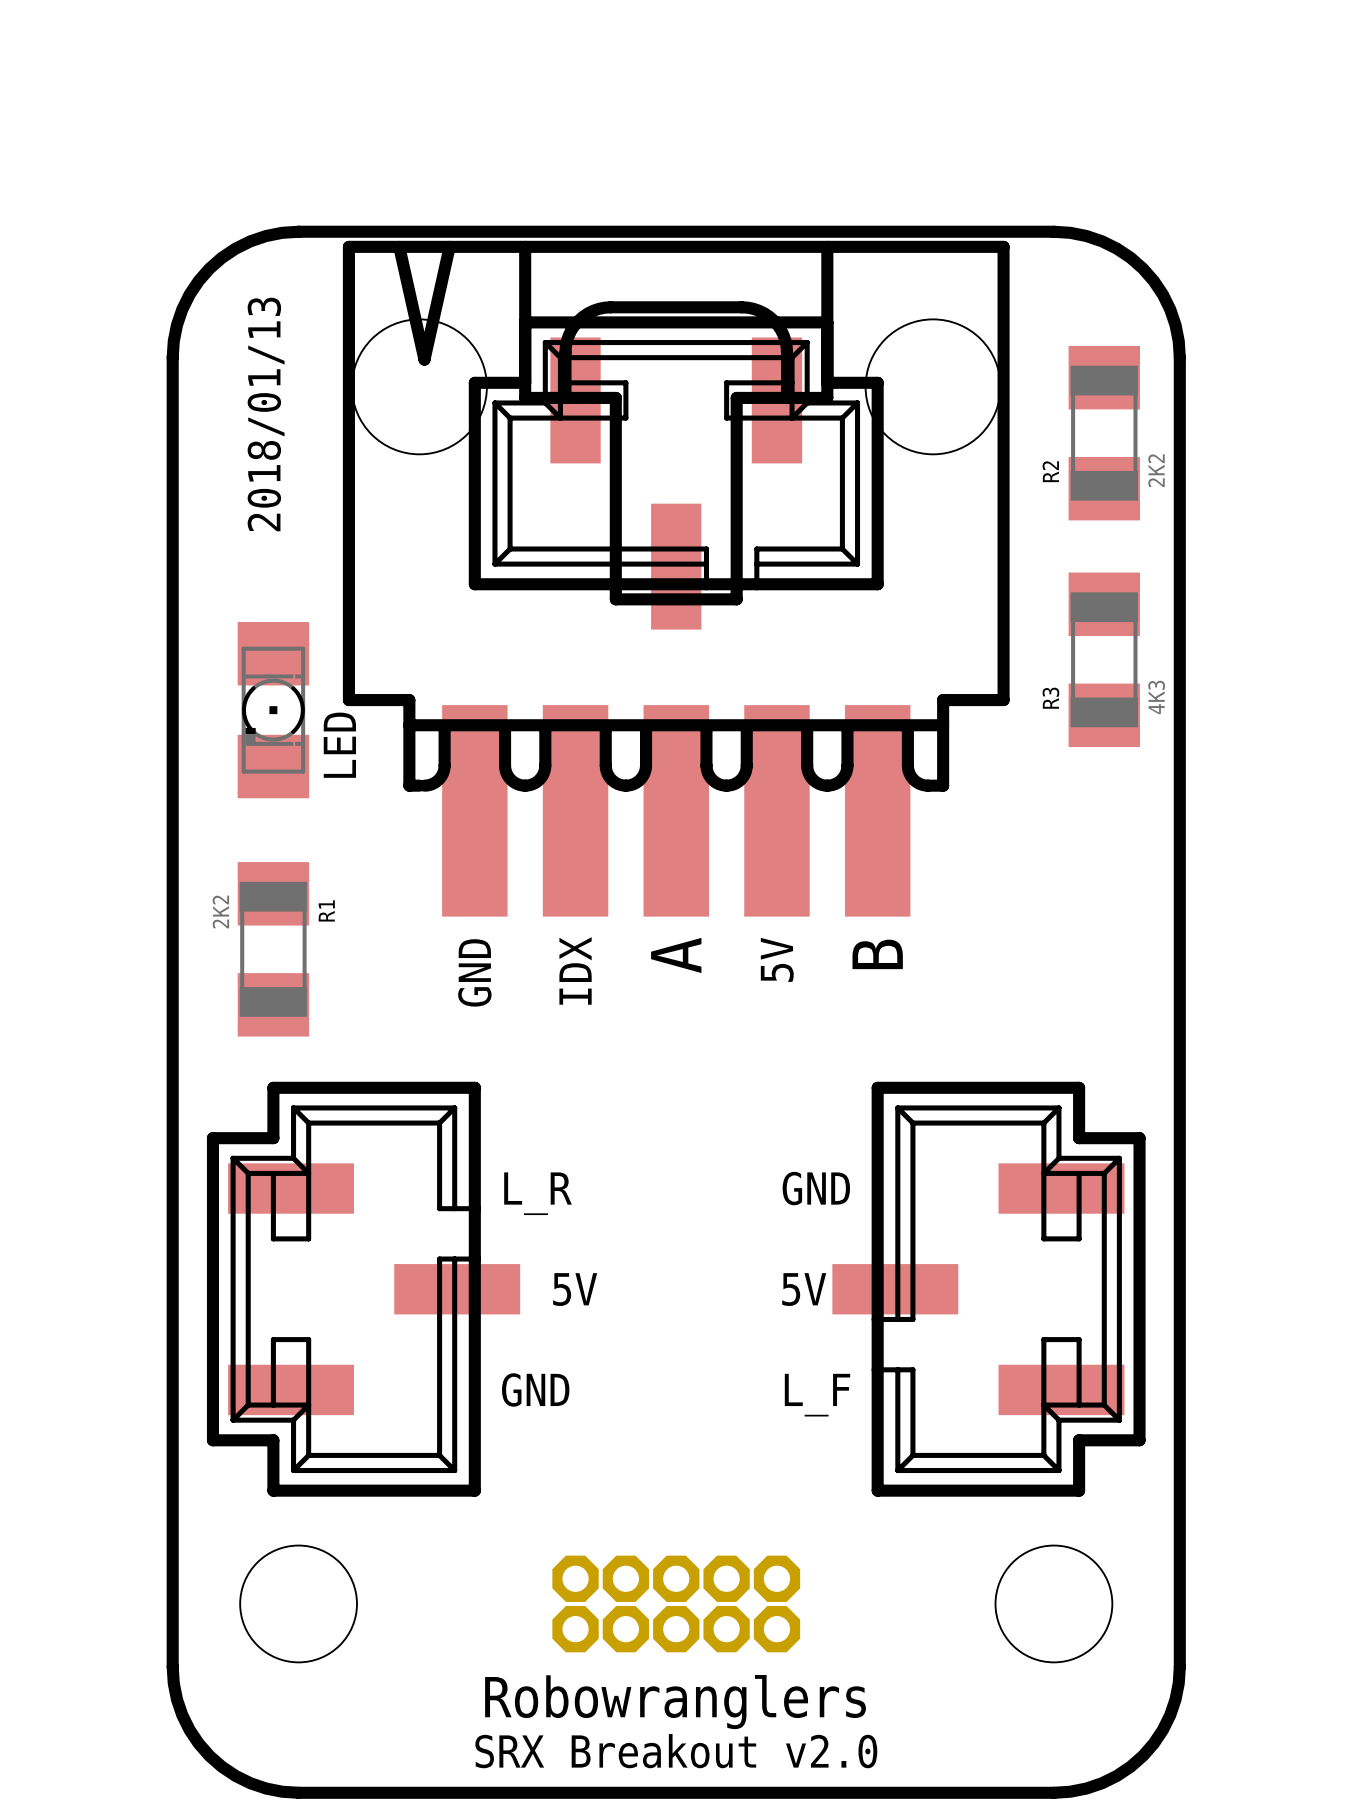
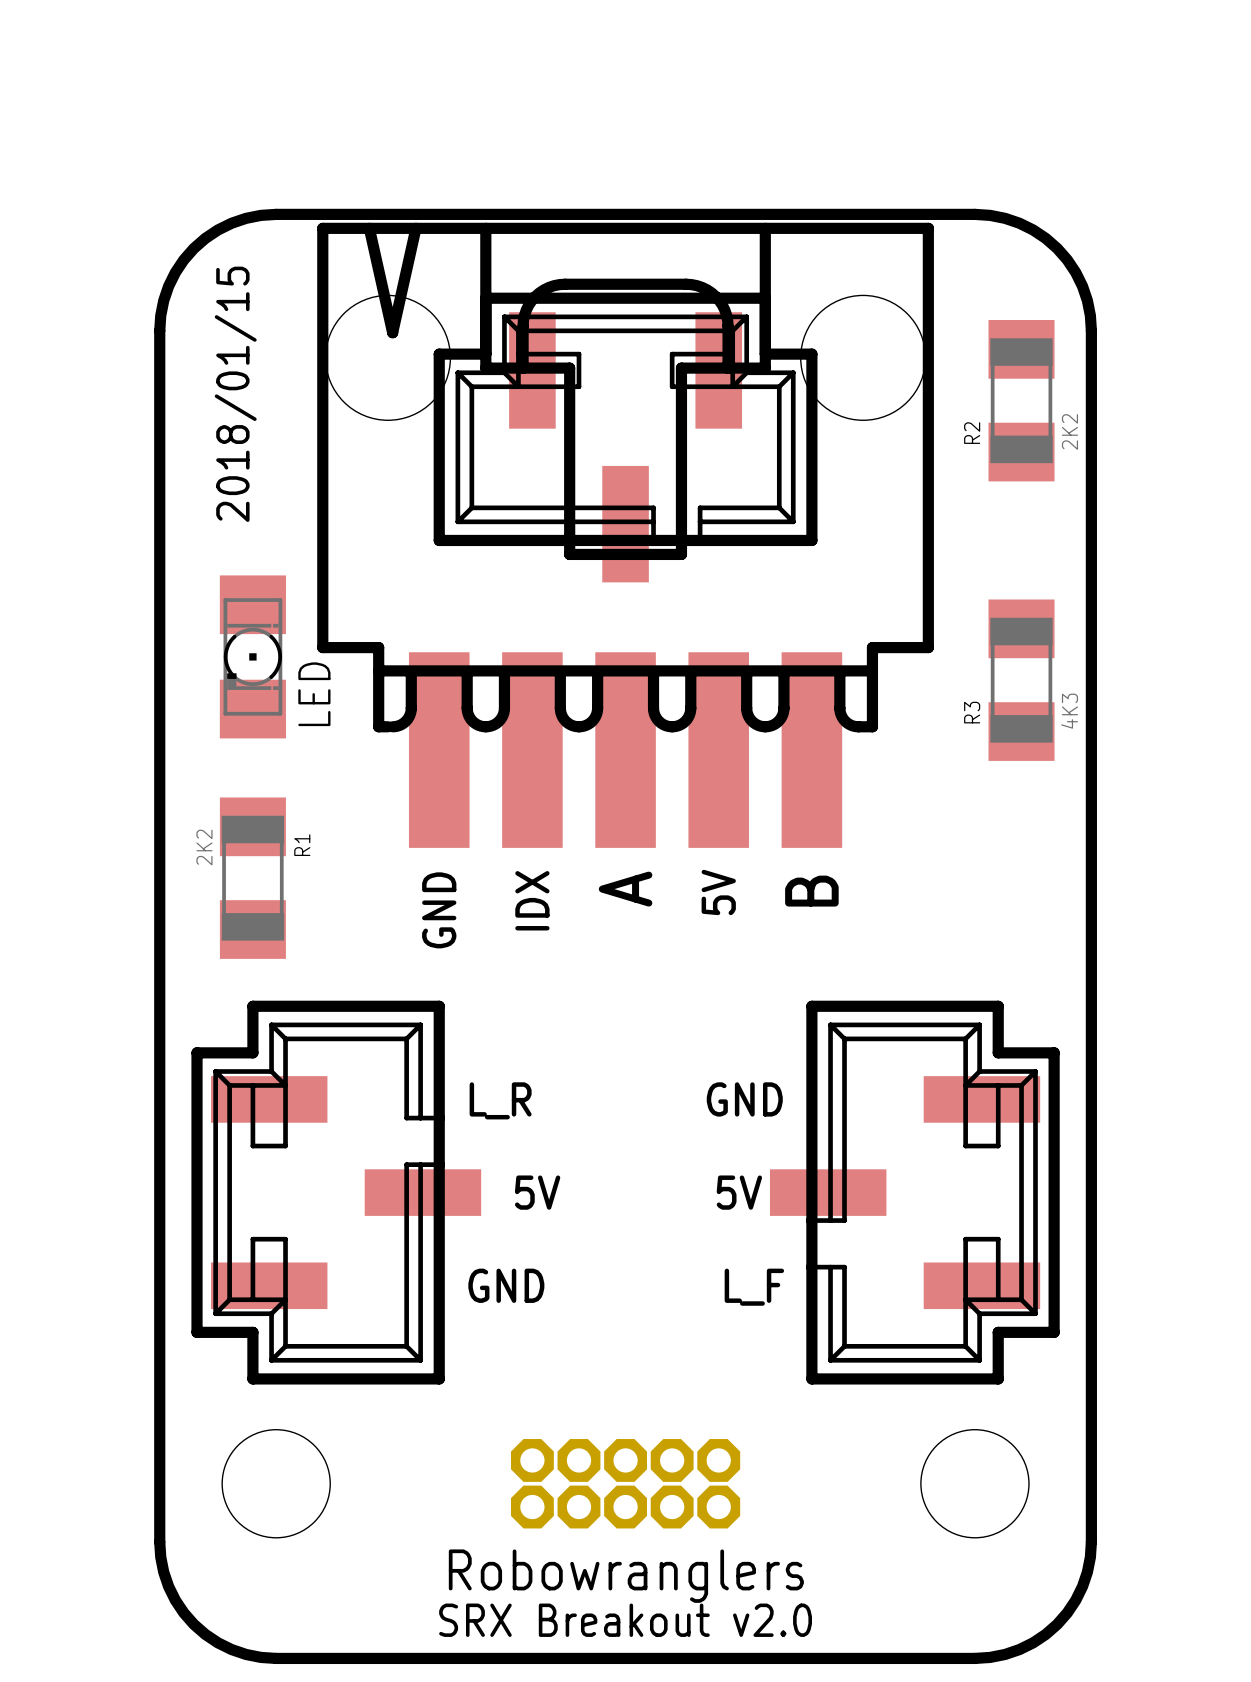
text: 2018/01/13 (266, 414) -> 2018/01/15 (235, 394)
R3 position: (1104, 659) -> (1021, 680)

